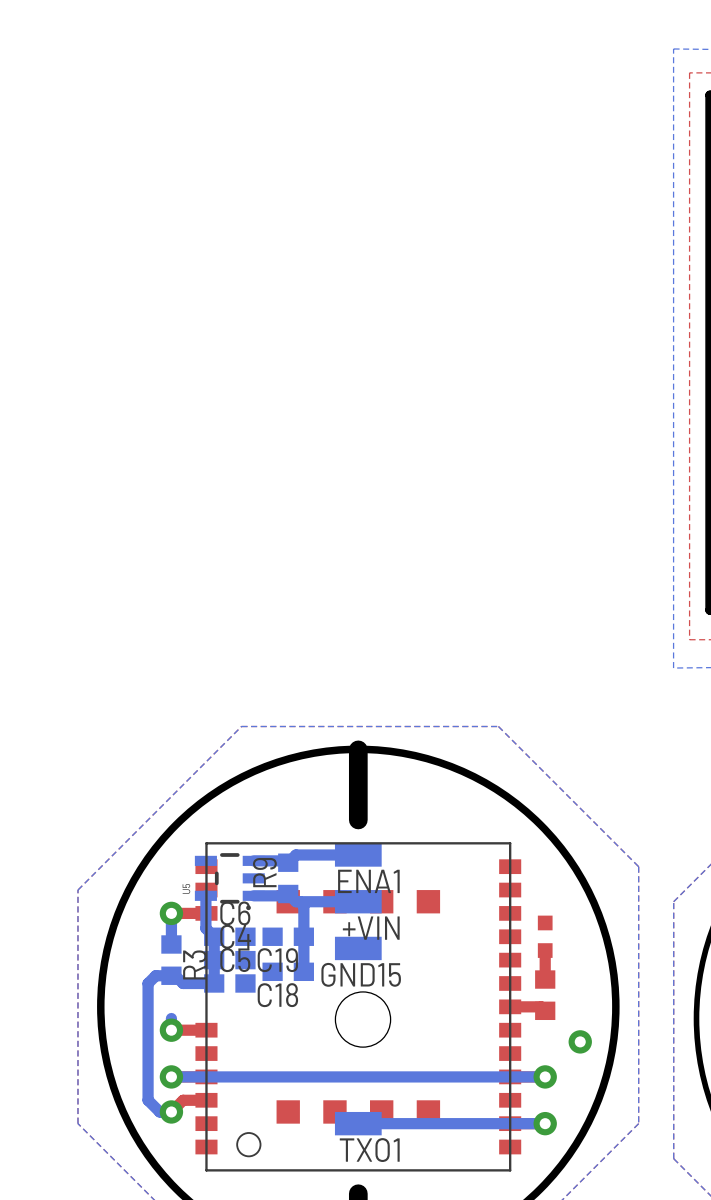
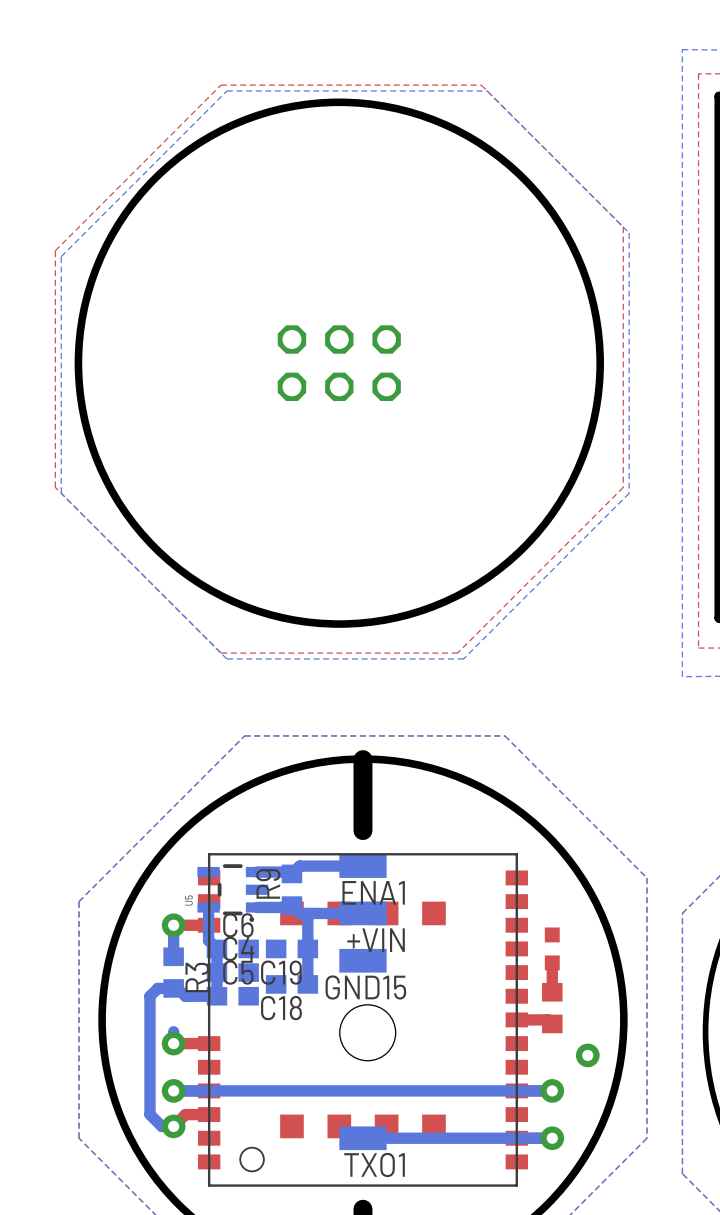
top zone outline: none -> (481, 85) (220, 85) (55, 250) (55, 487) (220, 653) (457, 653) (623, 487) (623, 227) (481, 85)
bottom zone outline: none -> (487, 91) (226, 91) (61, 256) (61, 493) (226, 658) (463, 658) (629, 493) (629, 233) (487, 91)
round board edge: none -> [74, 98, 604, 628]
part: none -> (339, 363)

